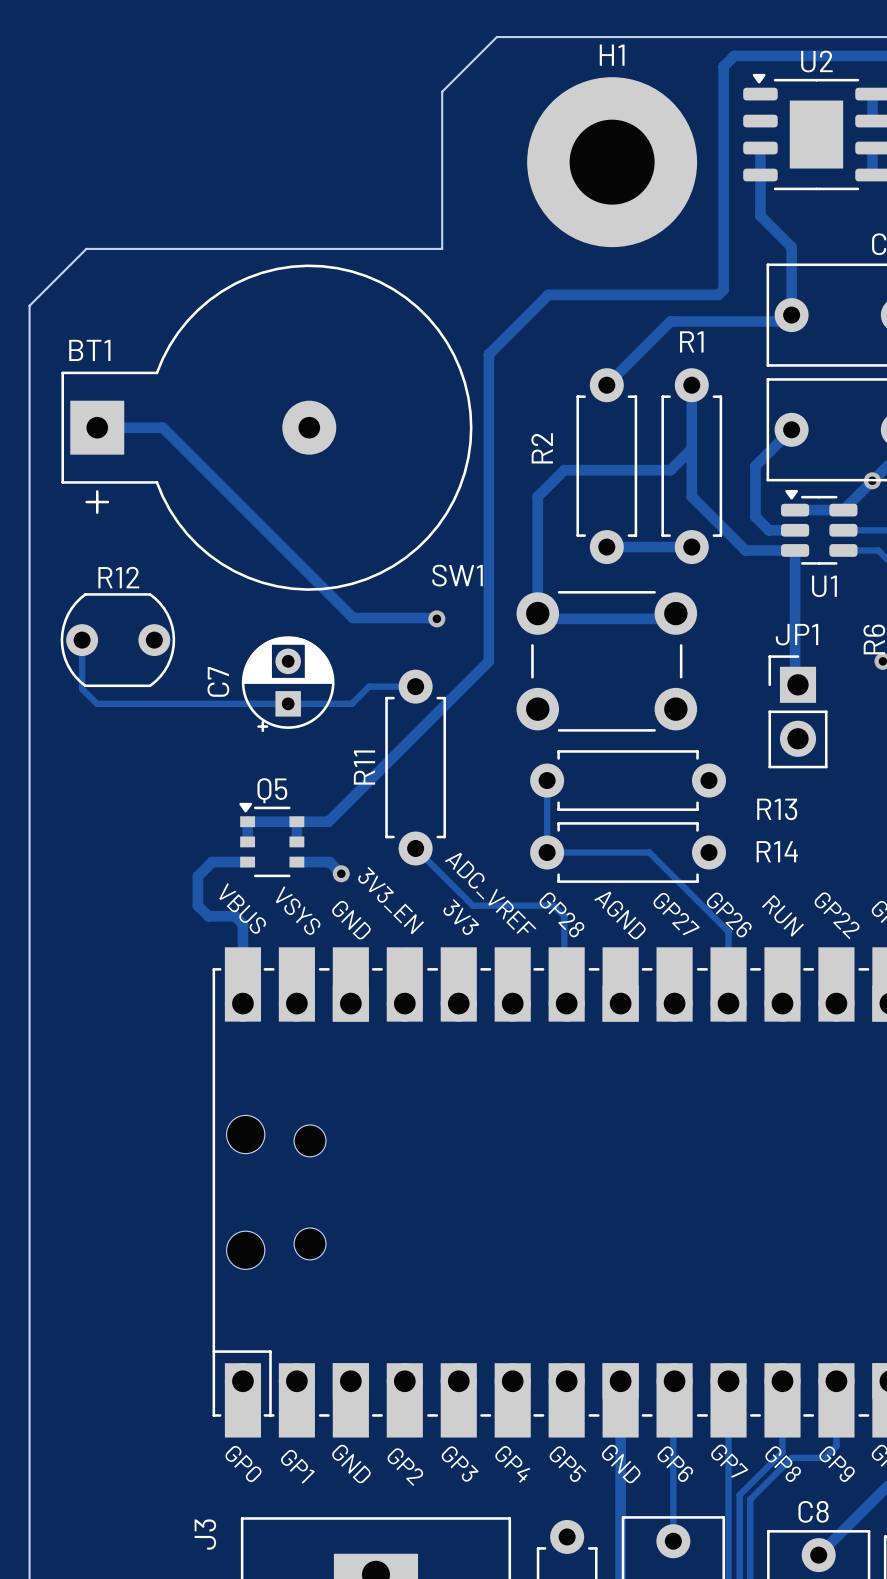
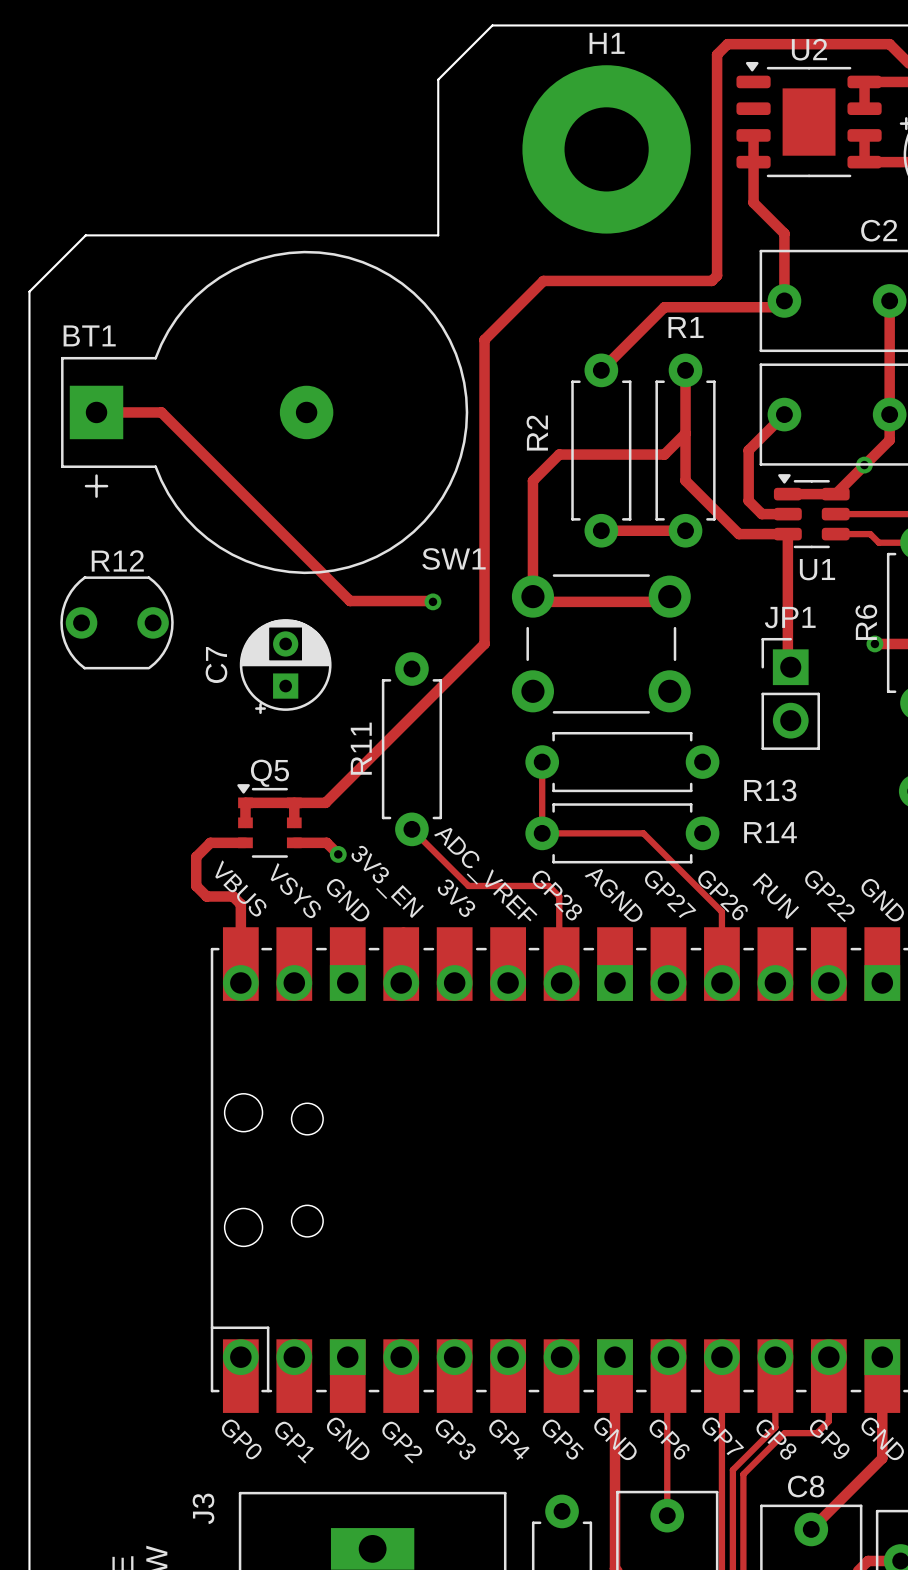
track: (82, 640) (82, 688) (97, 703) (351, 703) (369, 686) (415, 686) -> none

